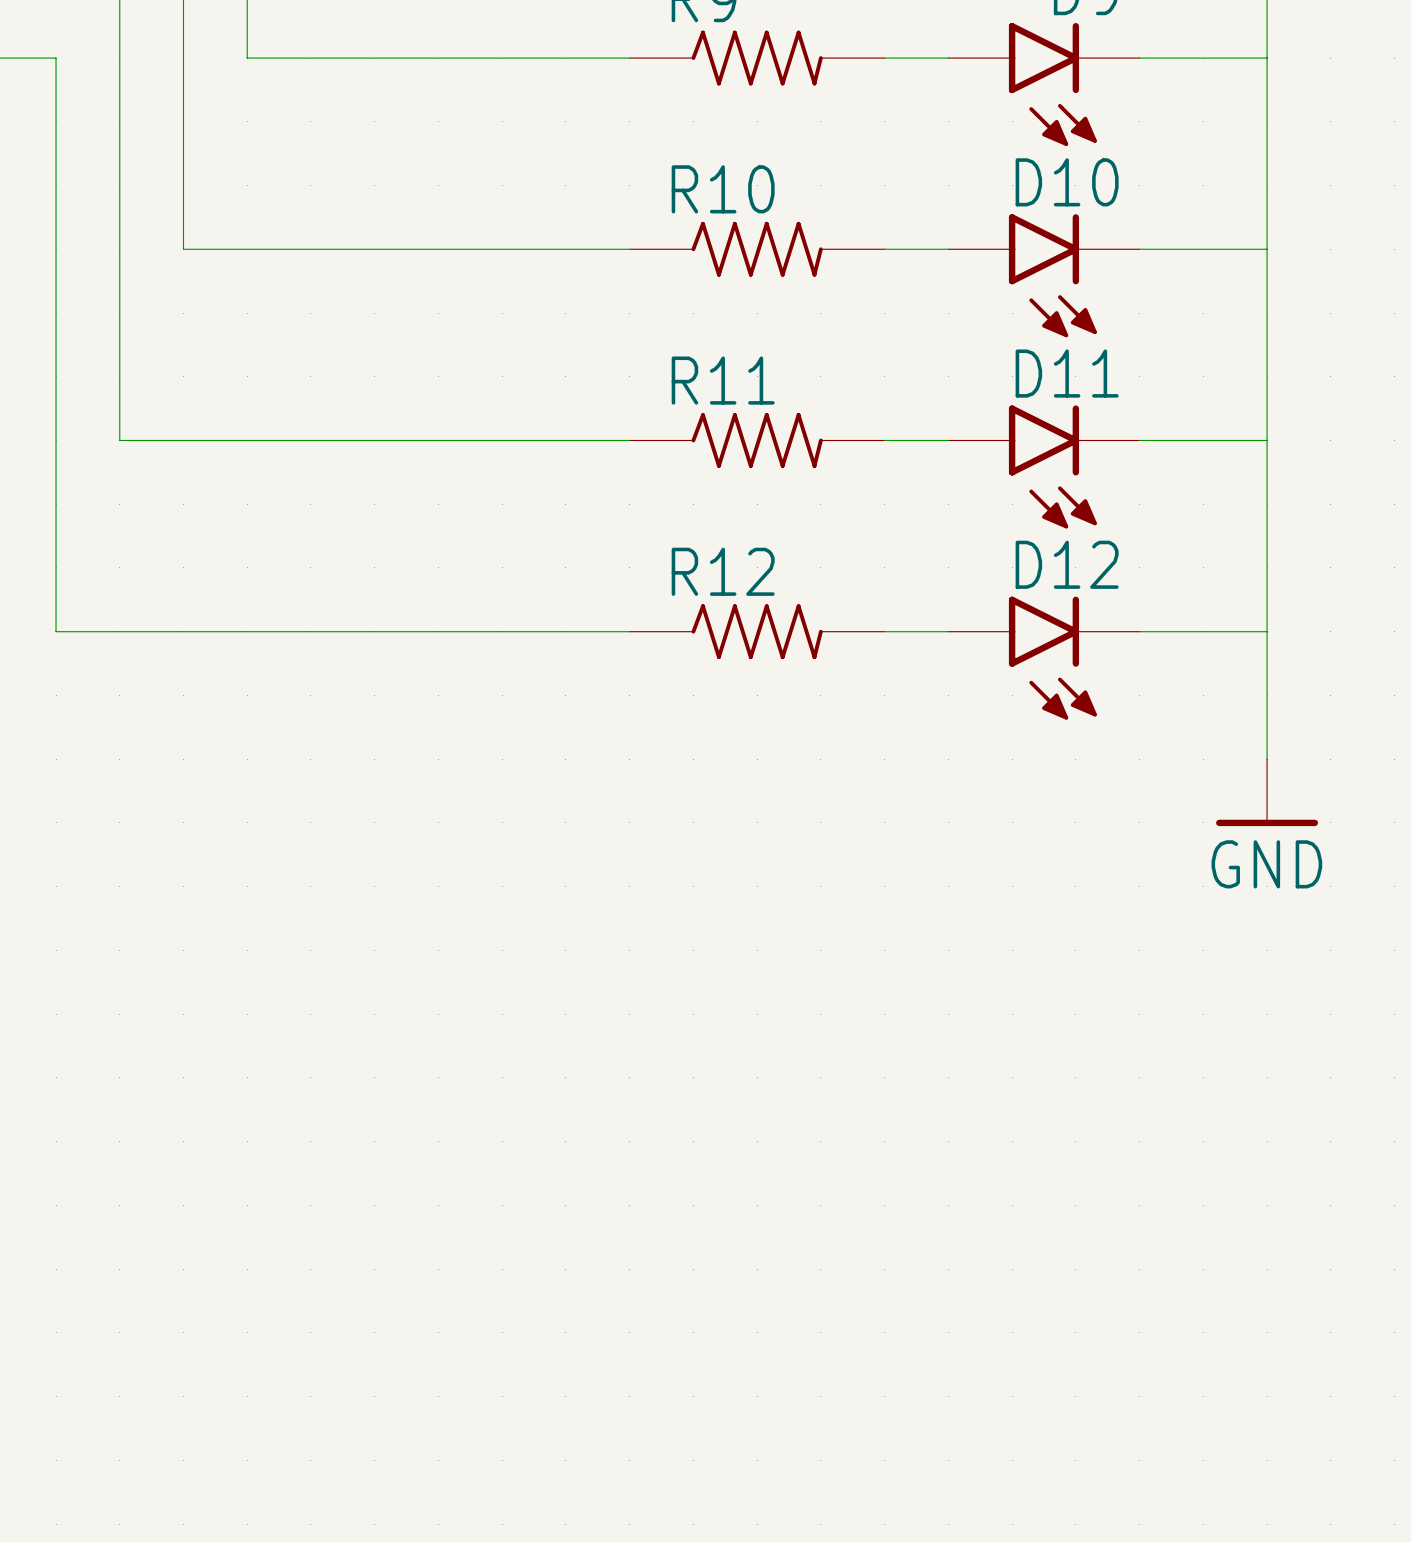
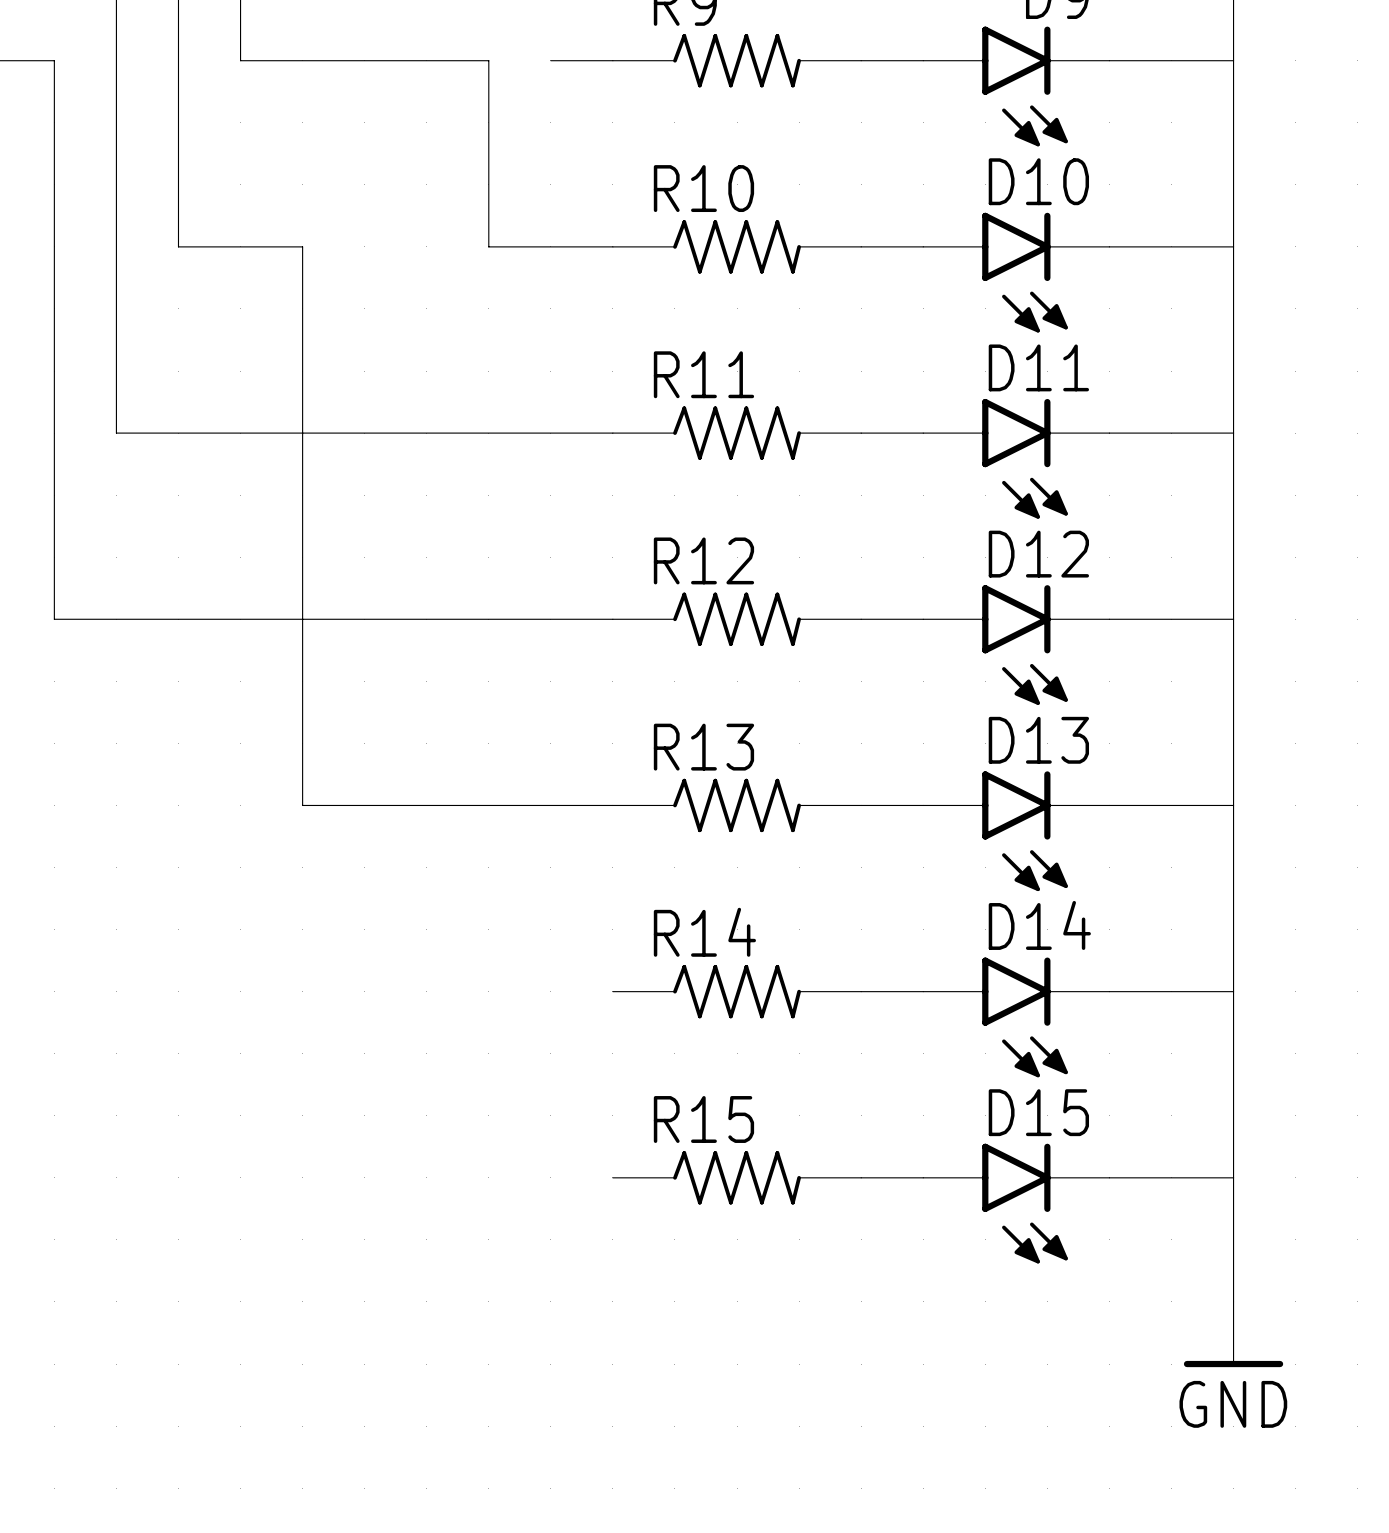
wire: (502, 58) (565, 58) -> (488, 60) (488, 246)
wire: (310, 249) (502, 249) -> (302, 246) (302, 805) (612, 805)
wire: none -> (1233, 743) (1233, 1301)
power symbol position: GND (1267, 792) -> GND (1233, 1334)
R13: none -> (737, 805)
wire: none -> (861, 805) (923, 805)
wire: none -> (1109, 805) (1233, 805)
D13: none -> (1016, 831)
R14: none -> (737, 991)
wire: none -> (861, 991) (923, 991)
wire: none -> (1109, 991) (1233, 991)
D14: none -> (1016, 1017)
R15: none -> (737, 1177)
wire: none -> (861, 1177) (923, 1177)
wire: none -> (1109, 1177) (1233, 1177)
D15: none -> (1016, 1203)

